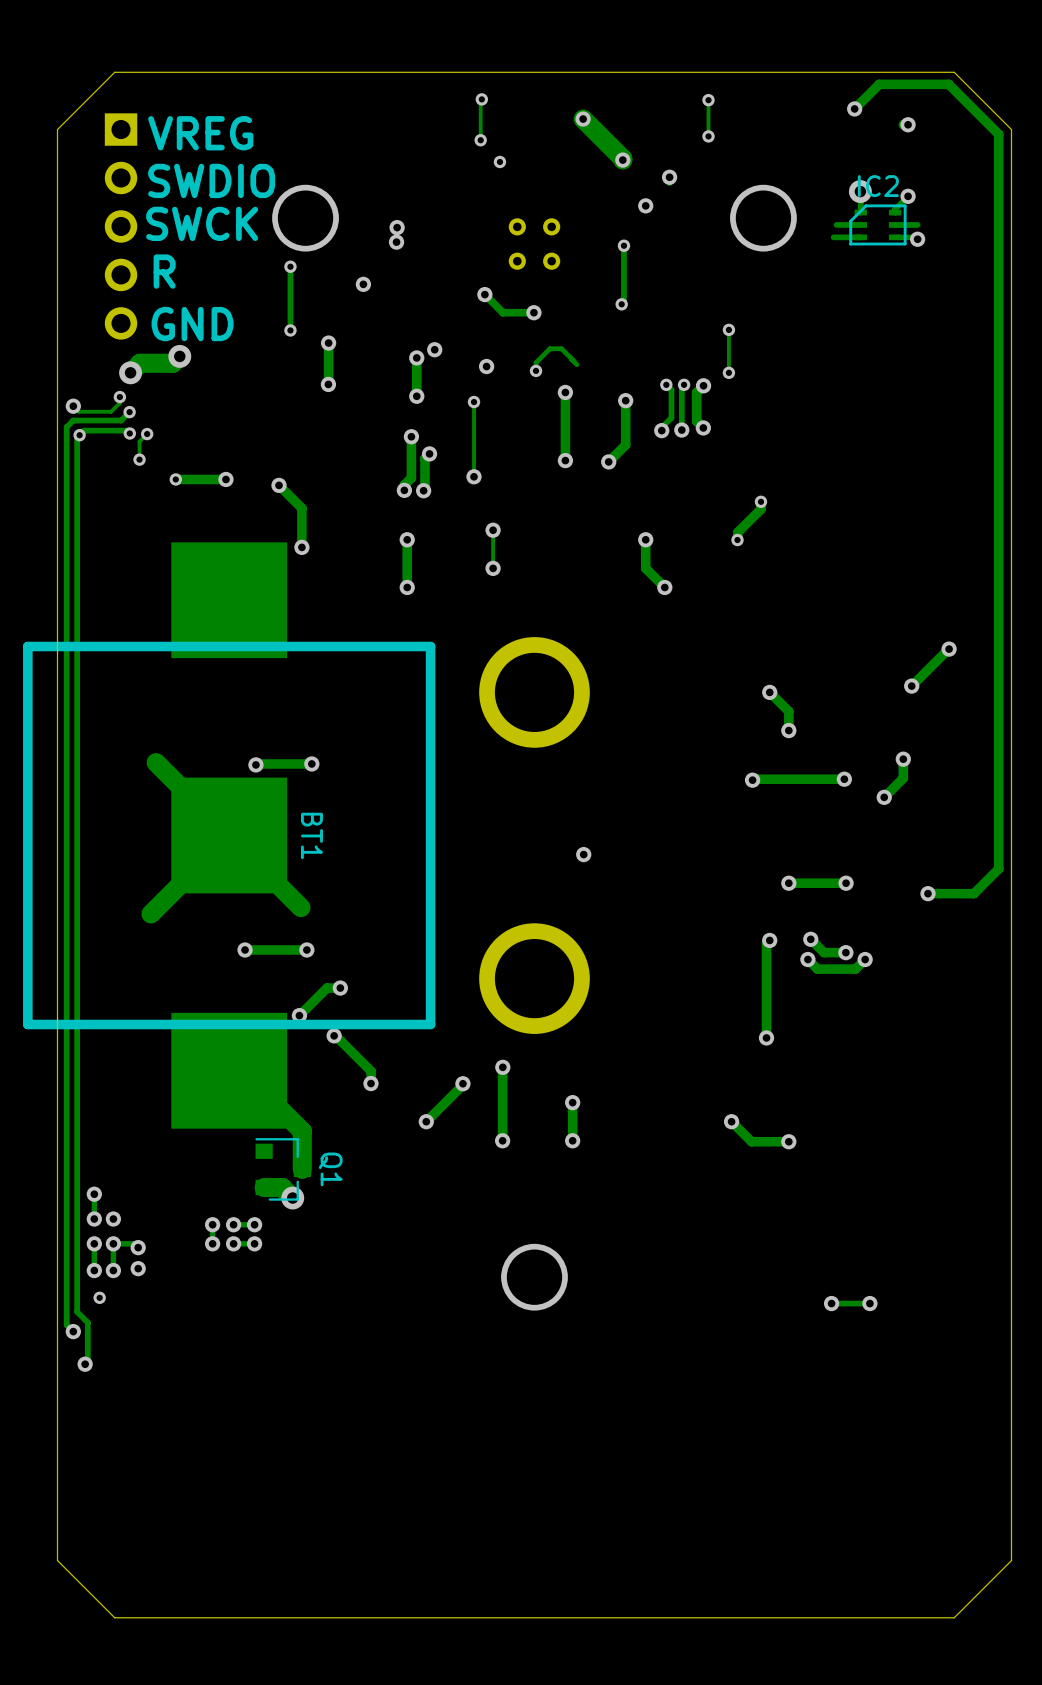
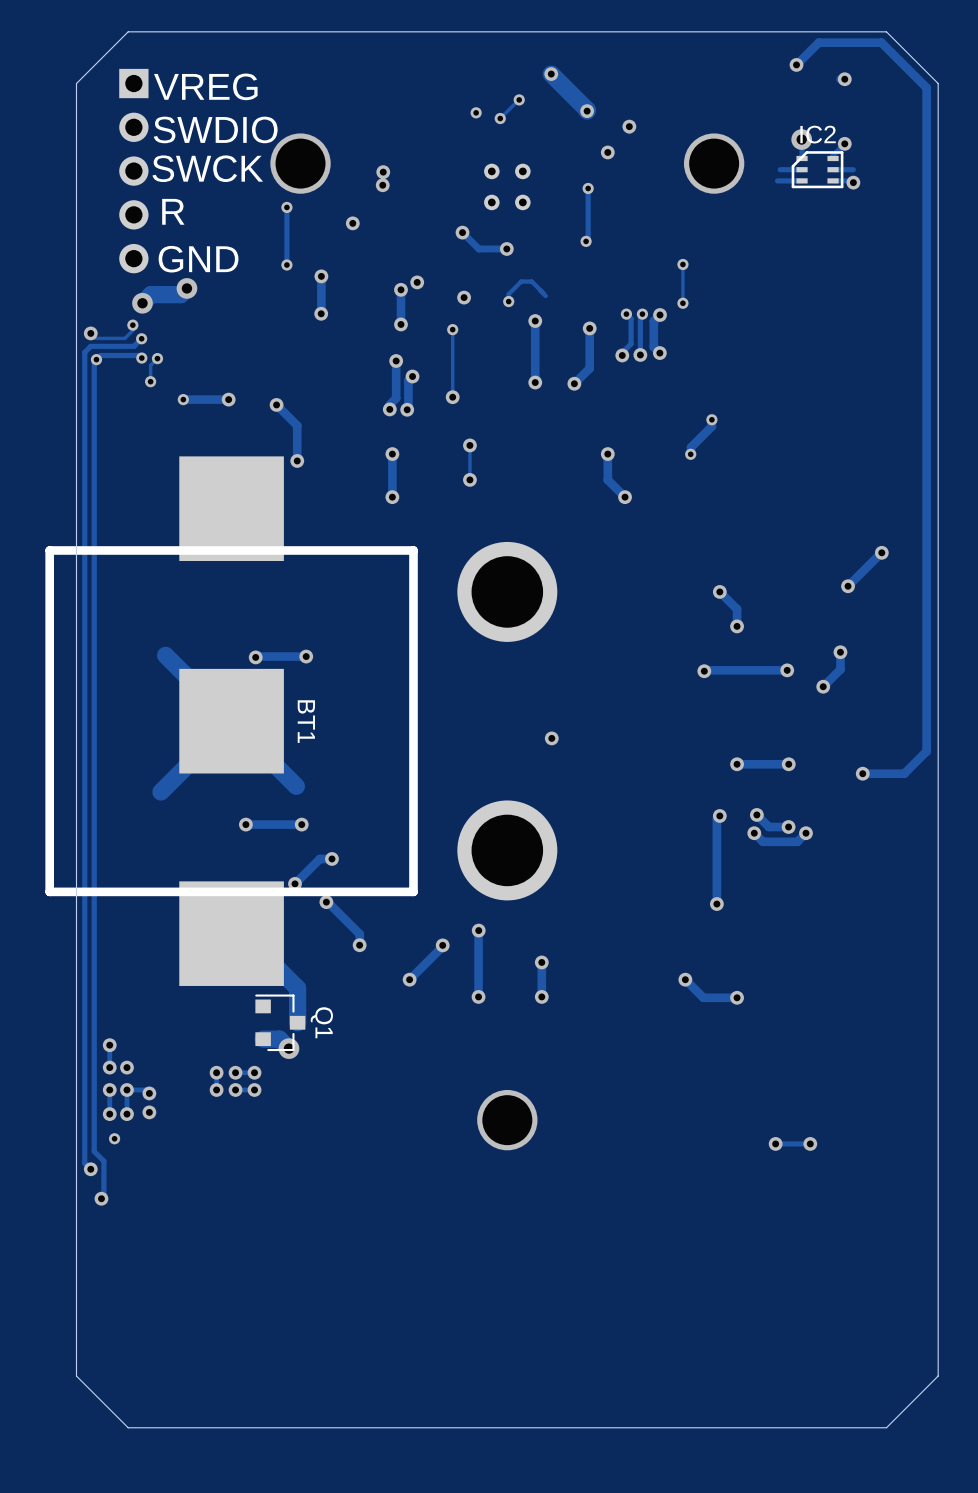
track: (481, 99) (480, 140) -> none
via: (481, 99) -> none
track: (708, 100) (708, 136) -> none
via: (708, 100) -> none
via: (708, 136) -> none
via: (480, 140) -> none
track: none -> (518, 99) (500, 118)
via: none -> (519, 99)
via: none -> (500, 118)

